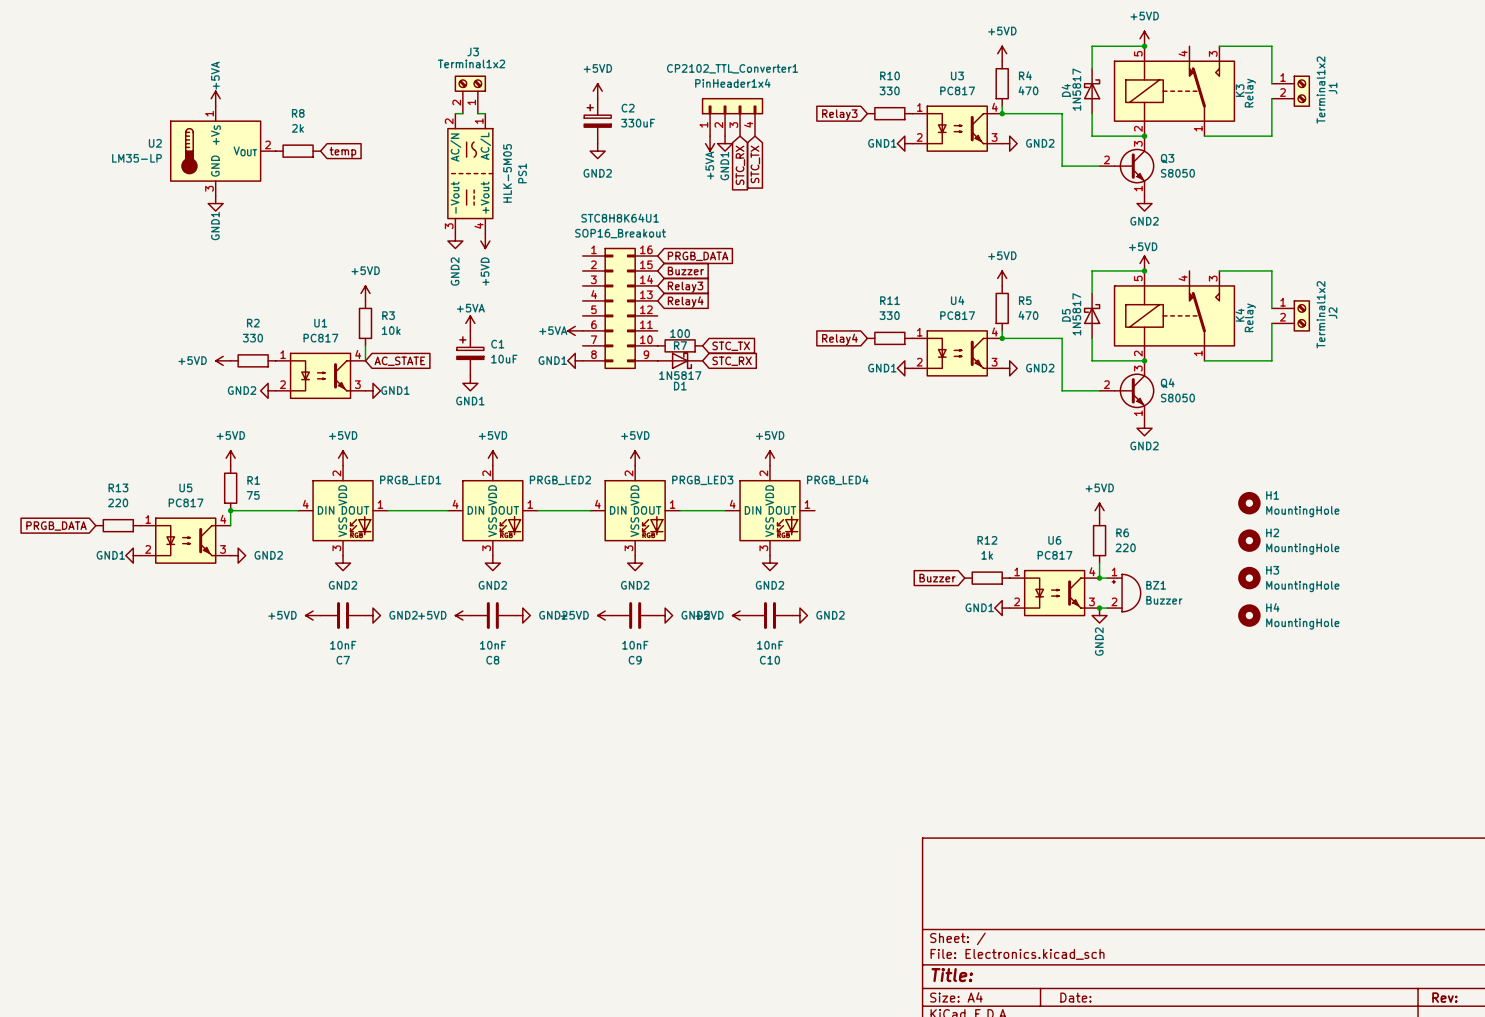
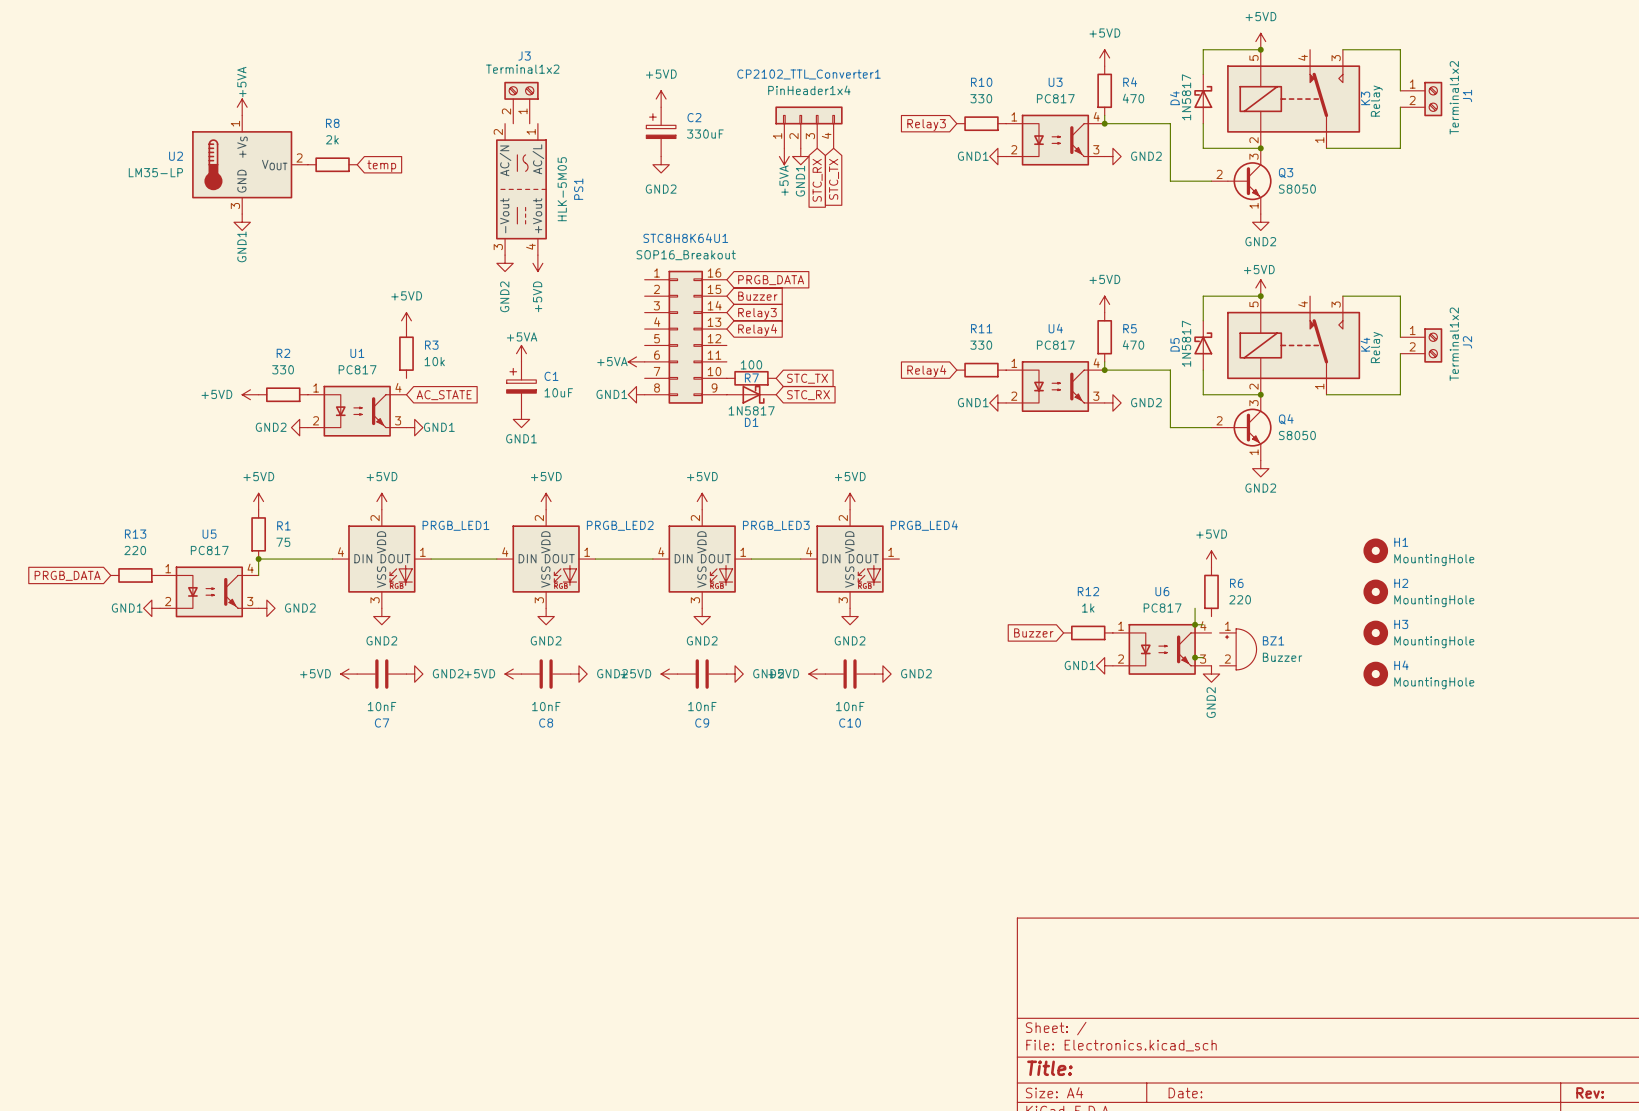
wire: (455, 113) (462, 113) -> none
wire: (477, 113) (485, 113) -> none
wire: (365, 345) (365, 360) -> none
wire: (1099, 563) (1099, 578) (1107, 578) -> (1195, 608) (1195, 624) (1203, 624)
junction: none -> (1195, 624)
junction: (1099, 578) -> none
junction: none -> (1195, 657)
wire: (1099, 608) (1107, 608) -> (1195, 657) (1203, 657)
junction: (1099, 608) -> none

